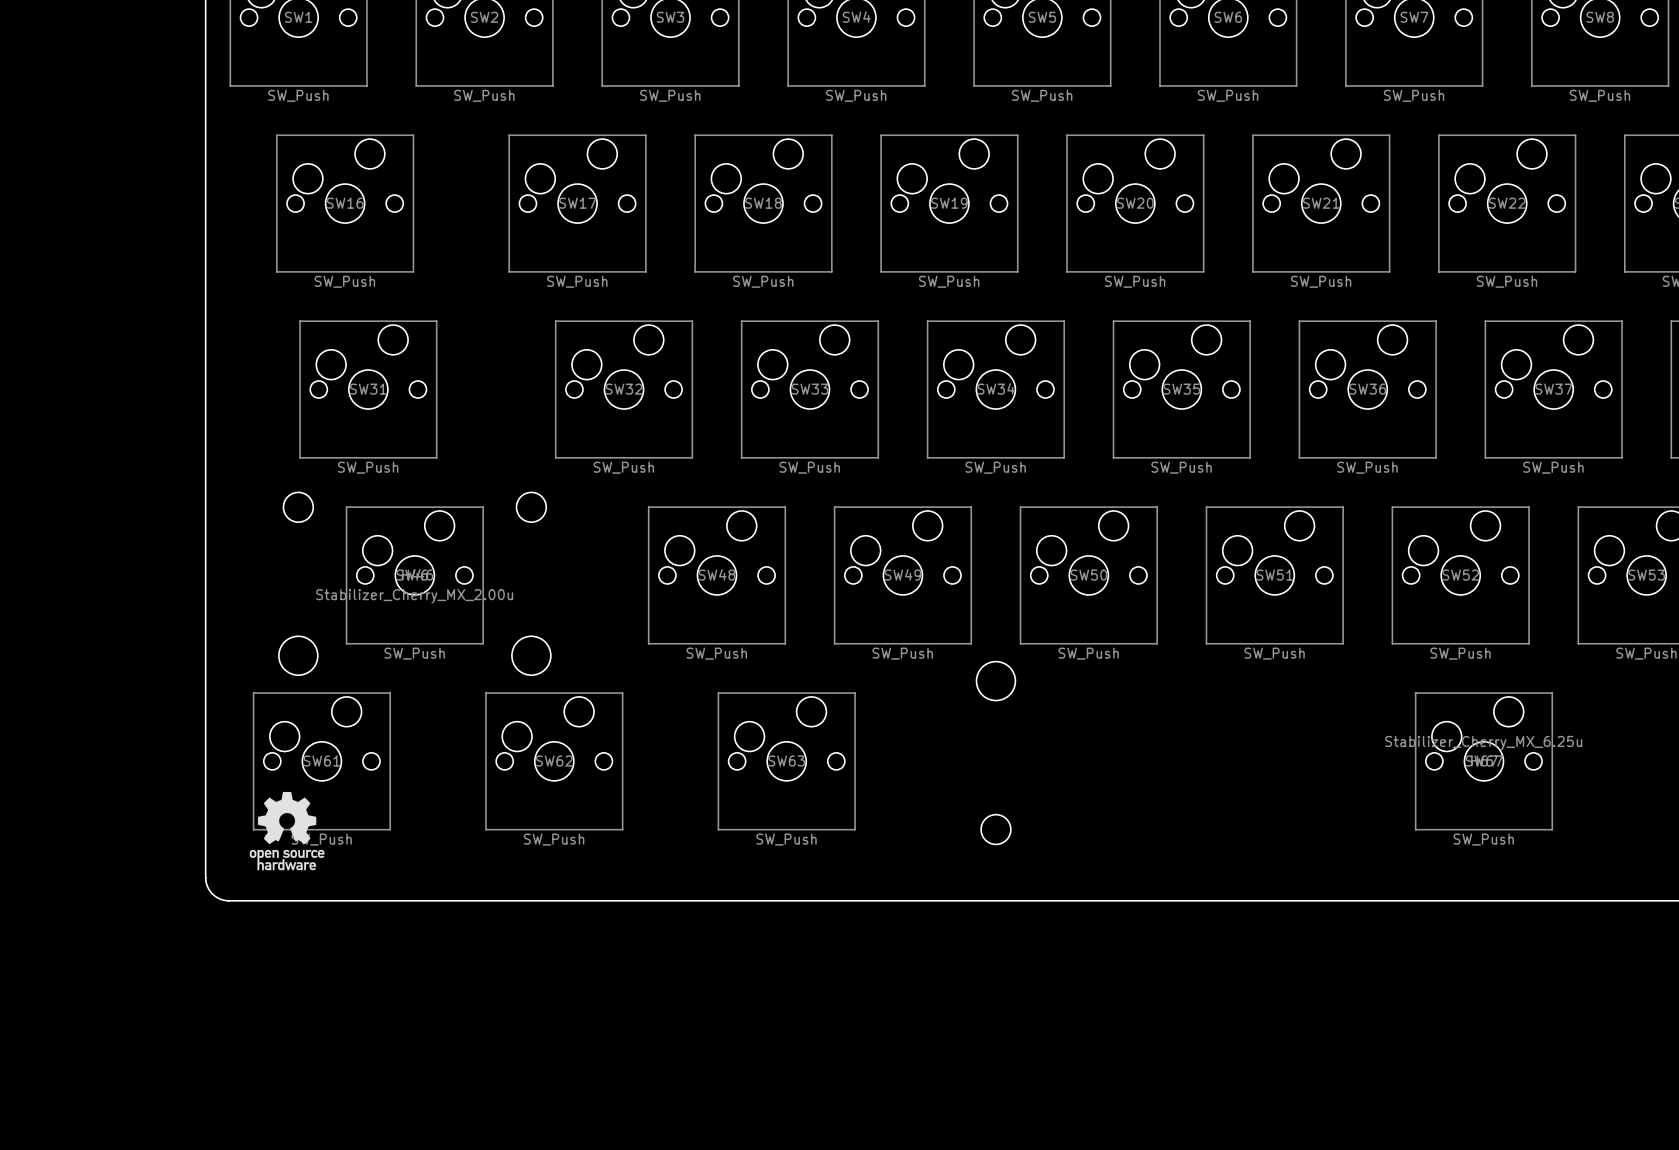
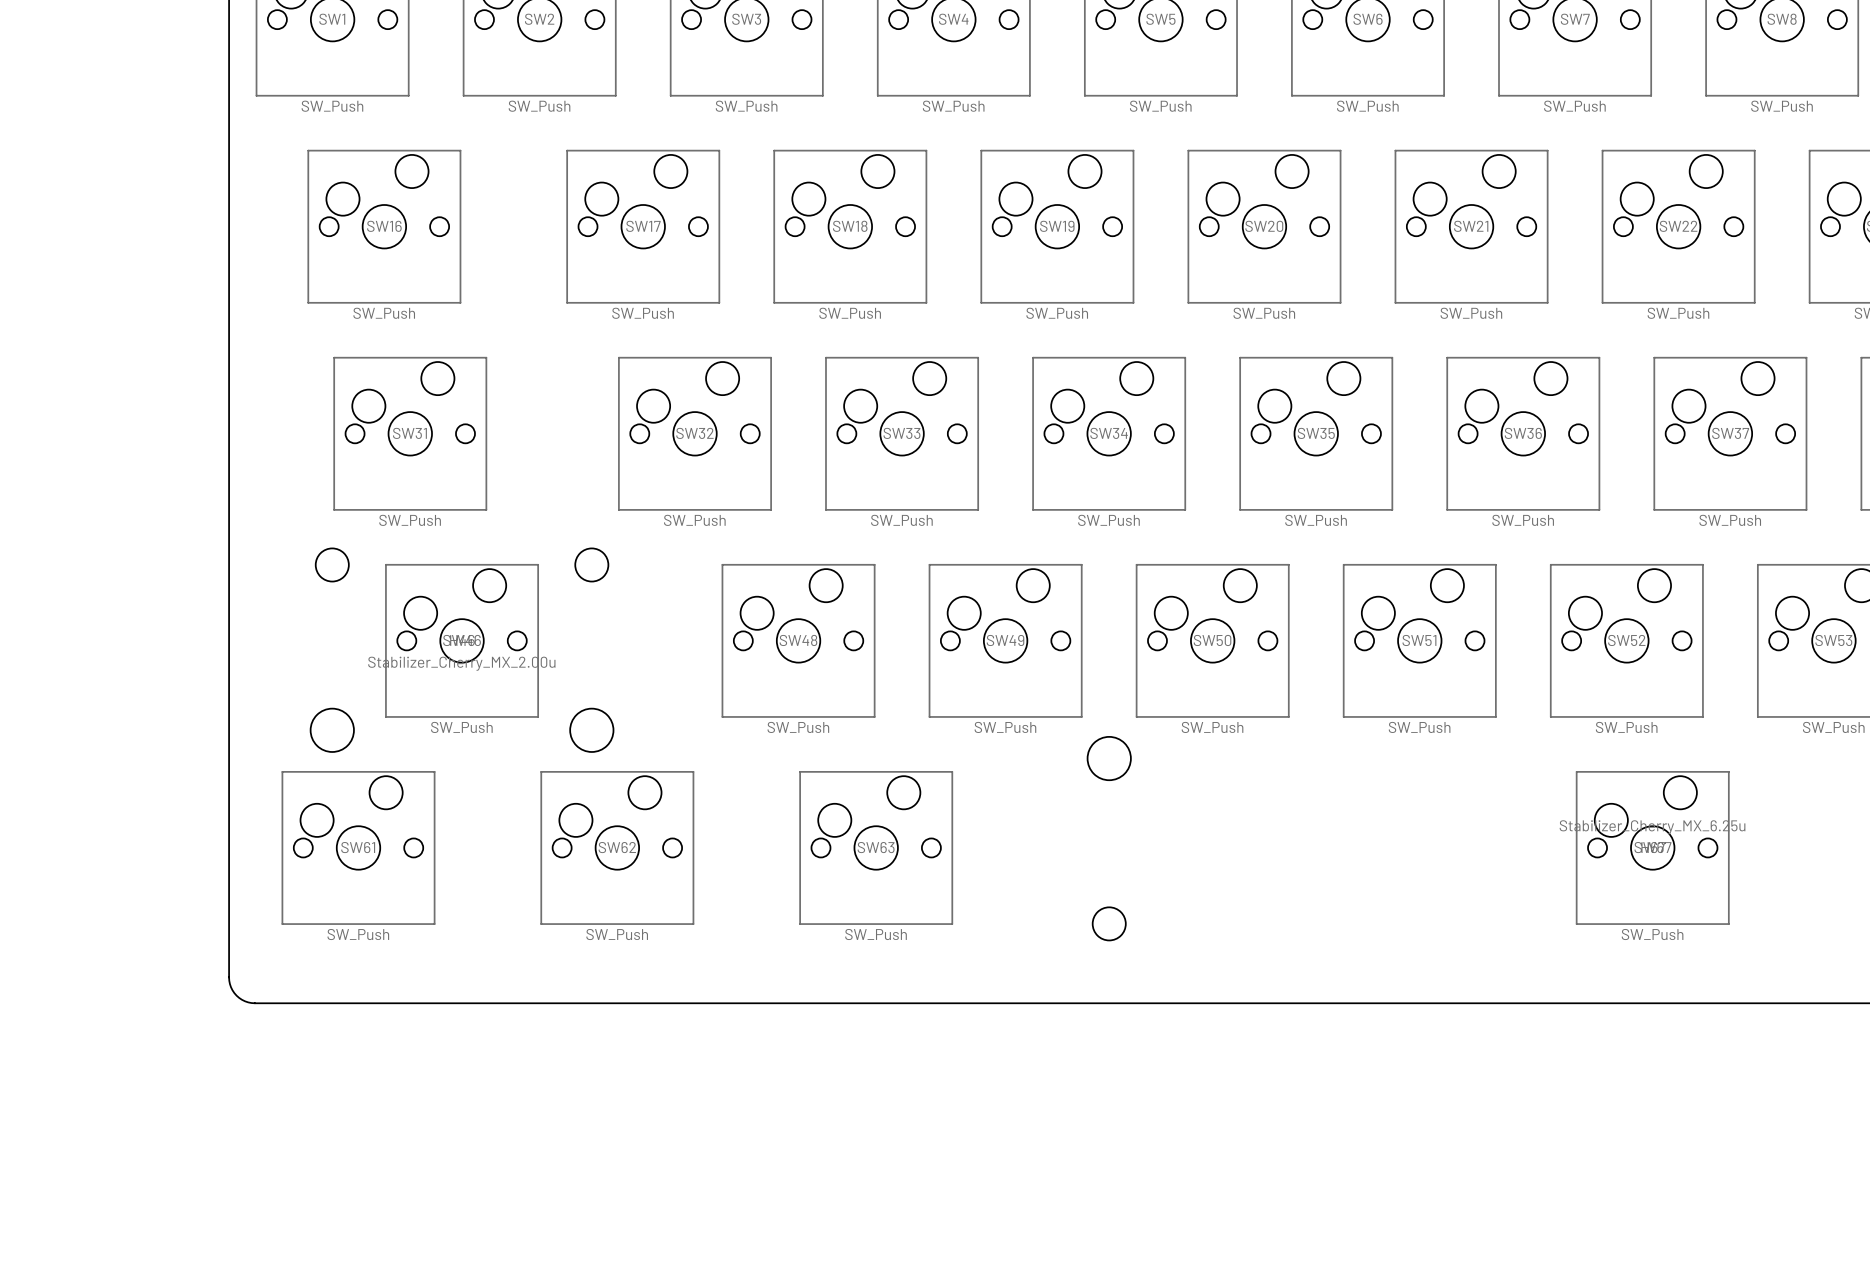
drawing: [249, 791, 325, 871] -> none

